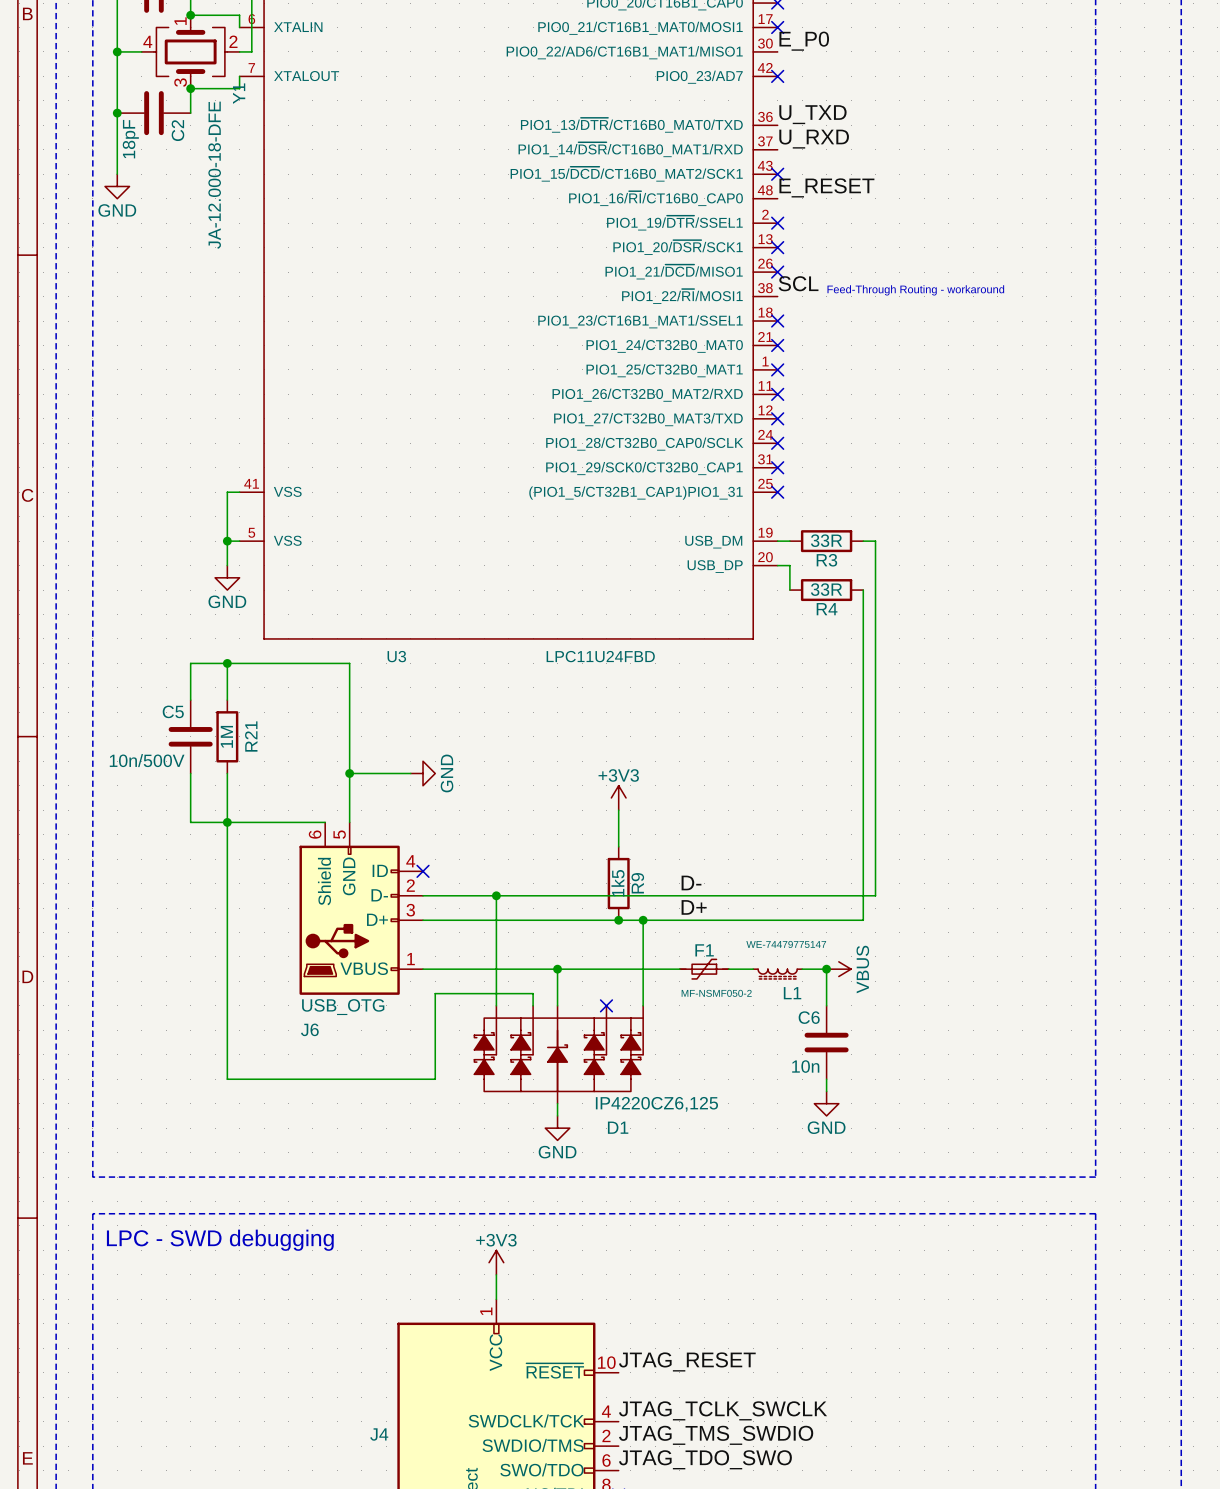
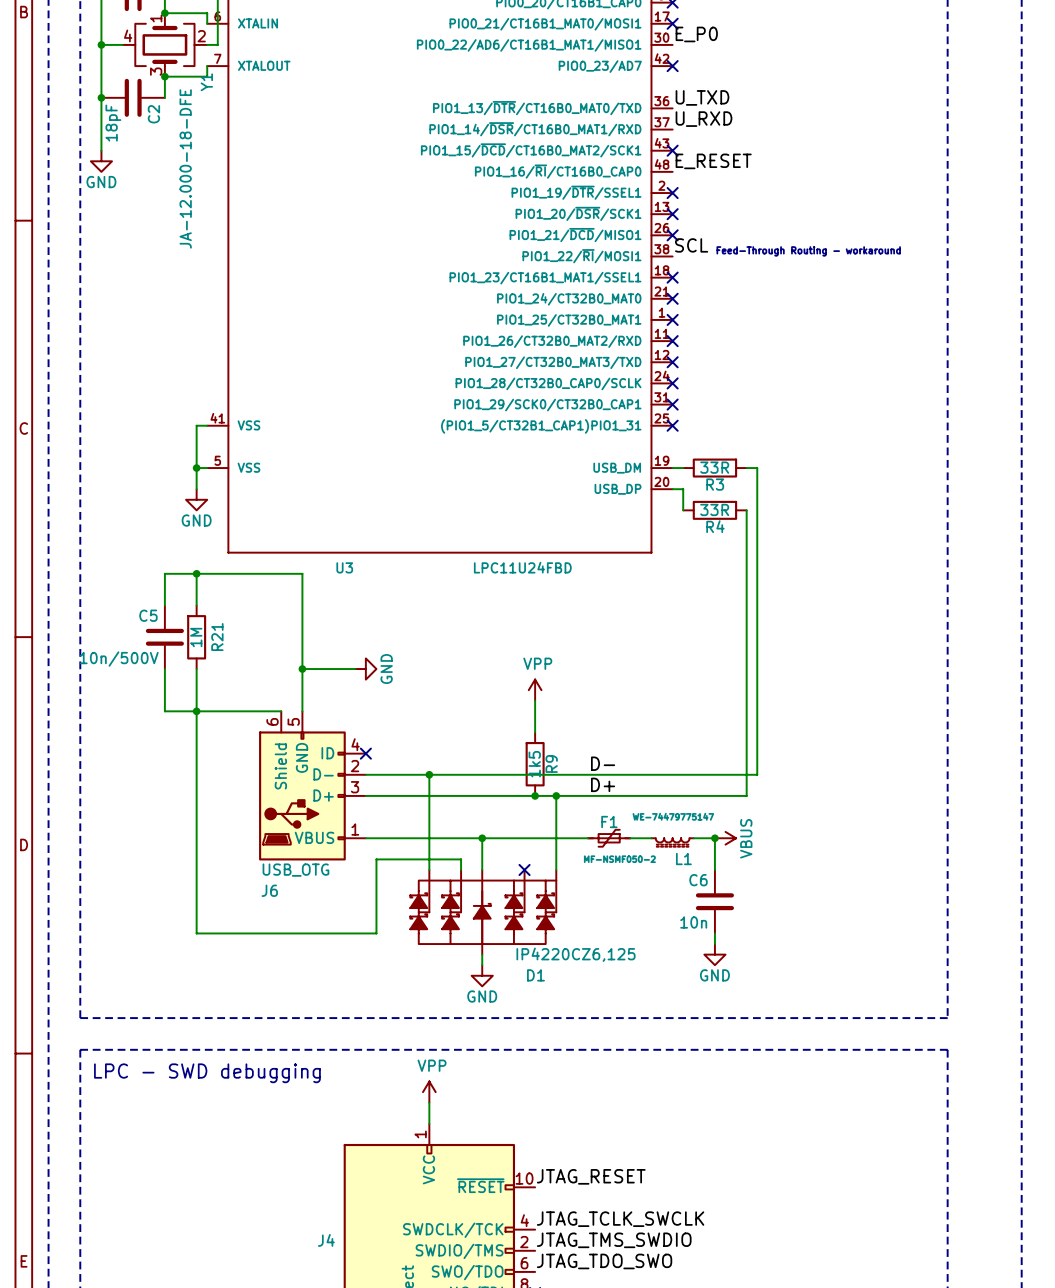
power symbol: +3V3 (618, 797) -> VPP (535, 690)
power symbol: +3V3 (496, 1262) -> VPP (429, 1092)

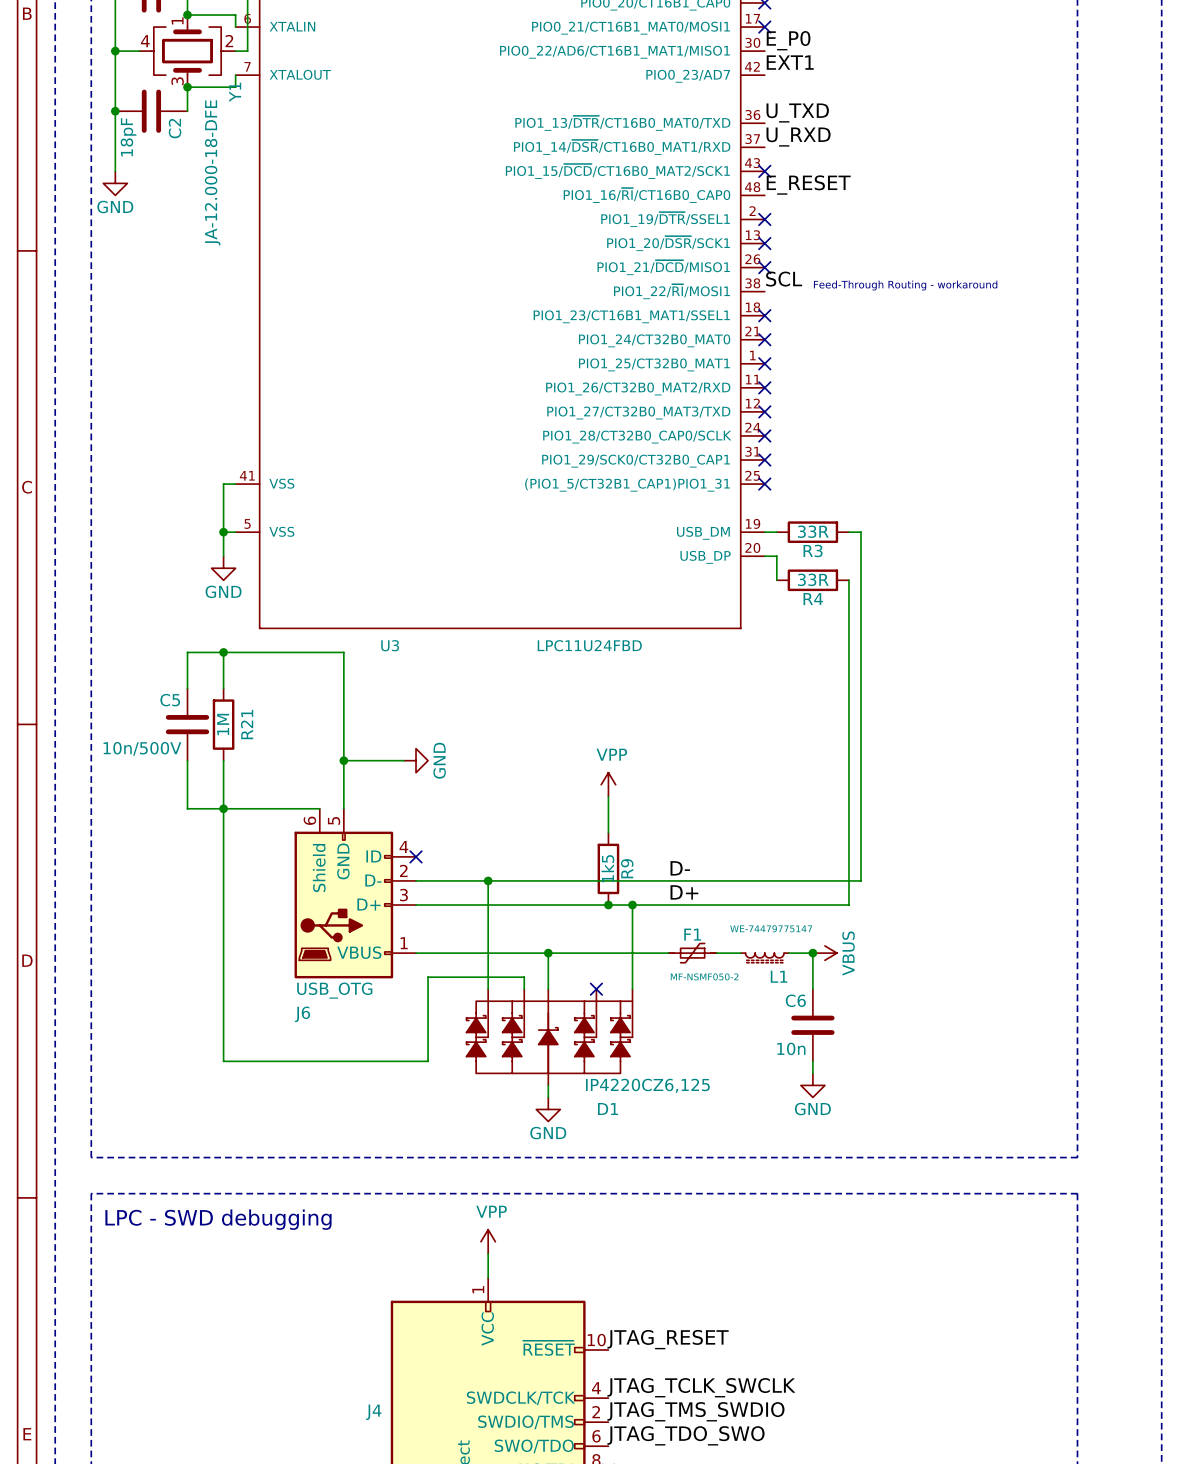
label: none -> EXT1 (790, 62)
no-connect mark: (672, 66) -> none

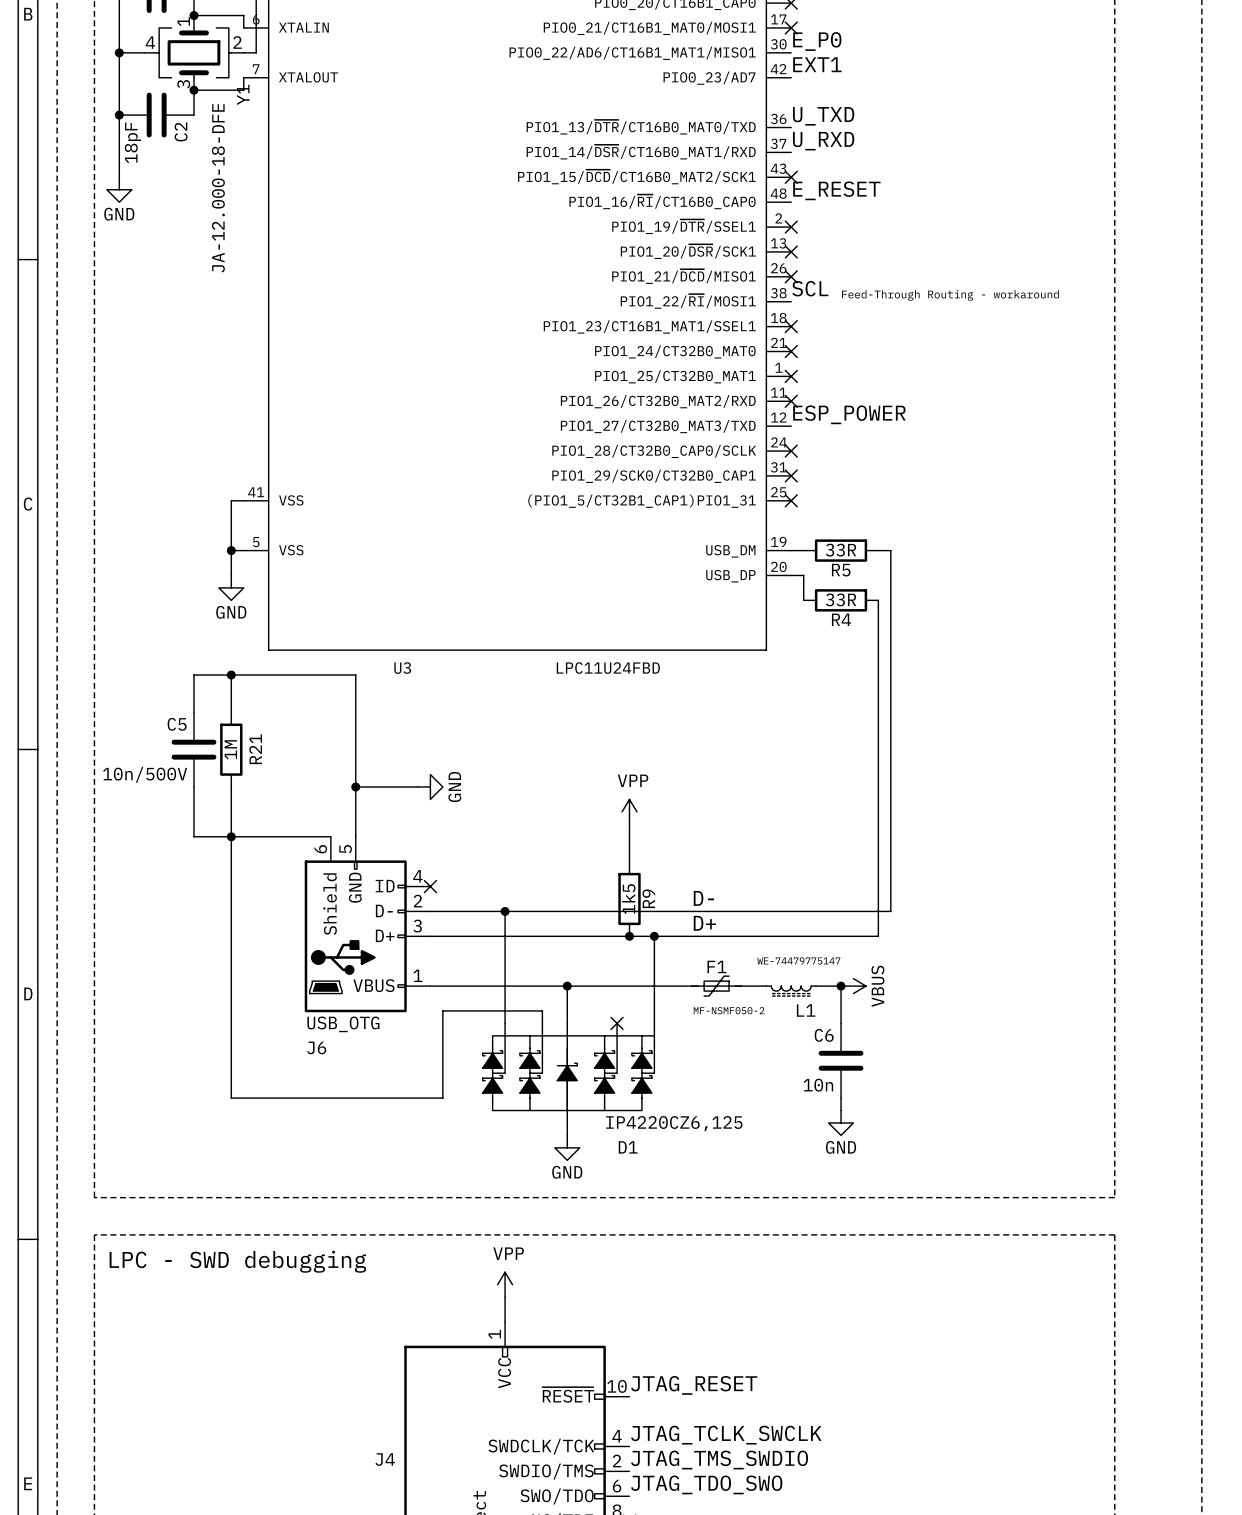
label: none -> ESP_POWER (849, 414)
no-connect mark: (764, 411) -> none
R3 name: R3 (813, 550) -> R5 (841, 570)

